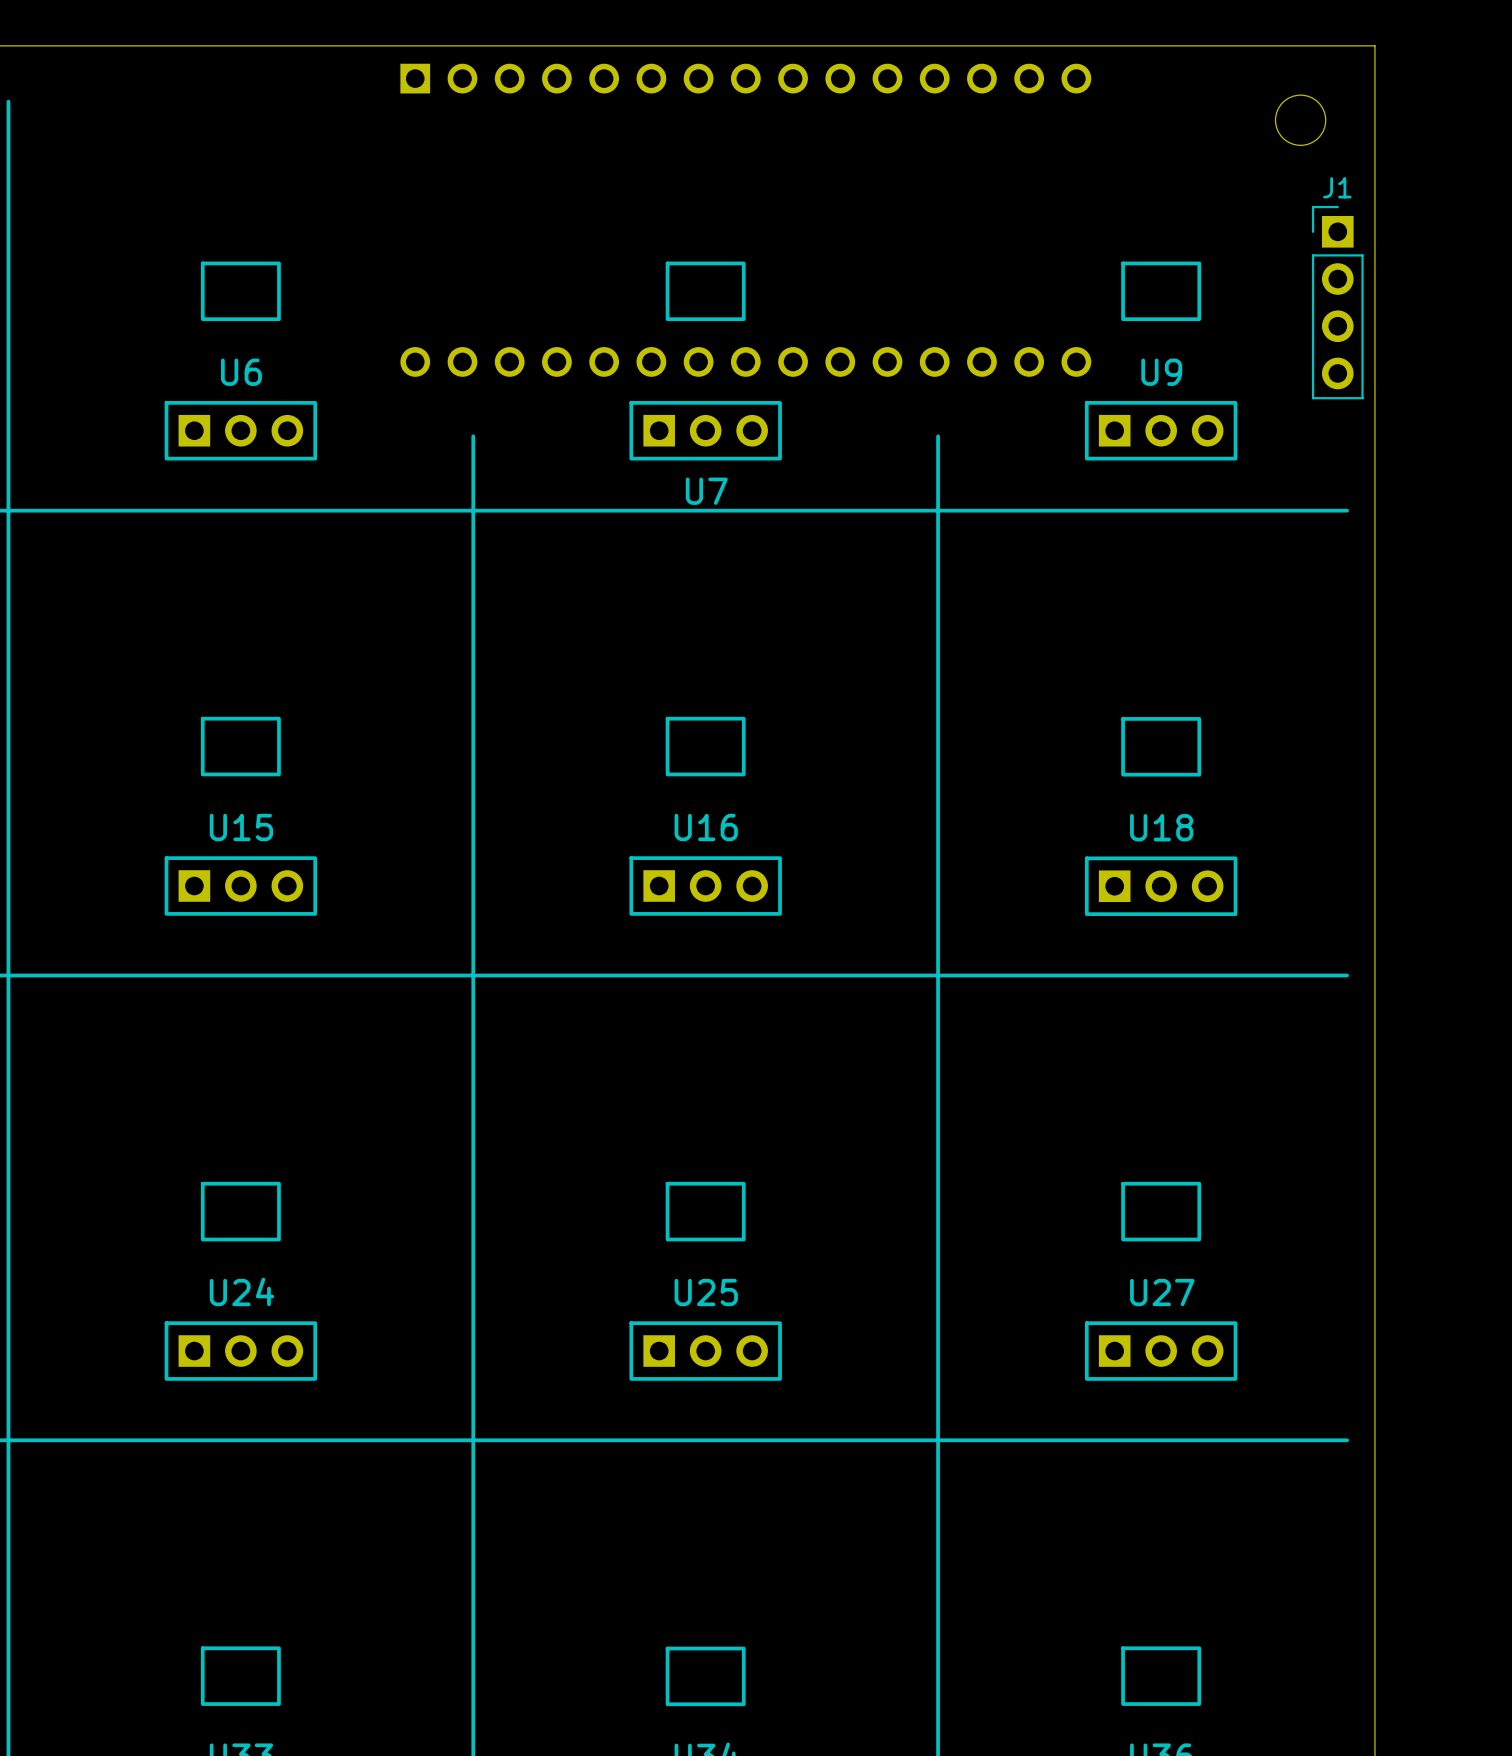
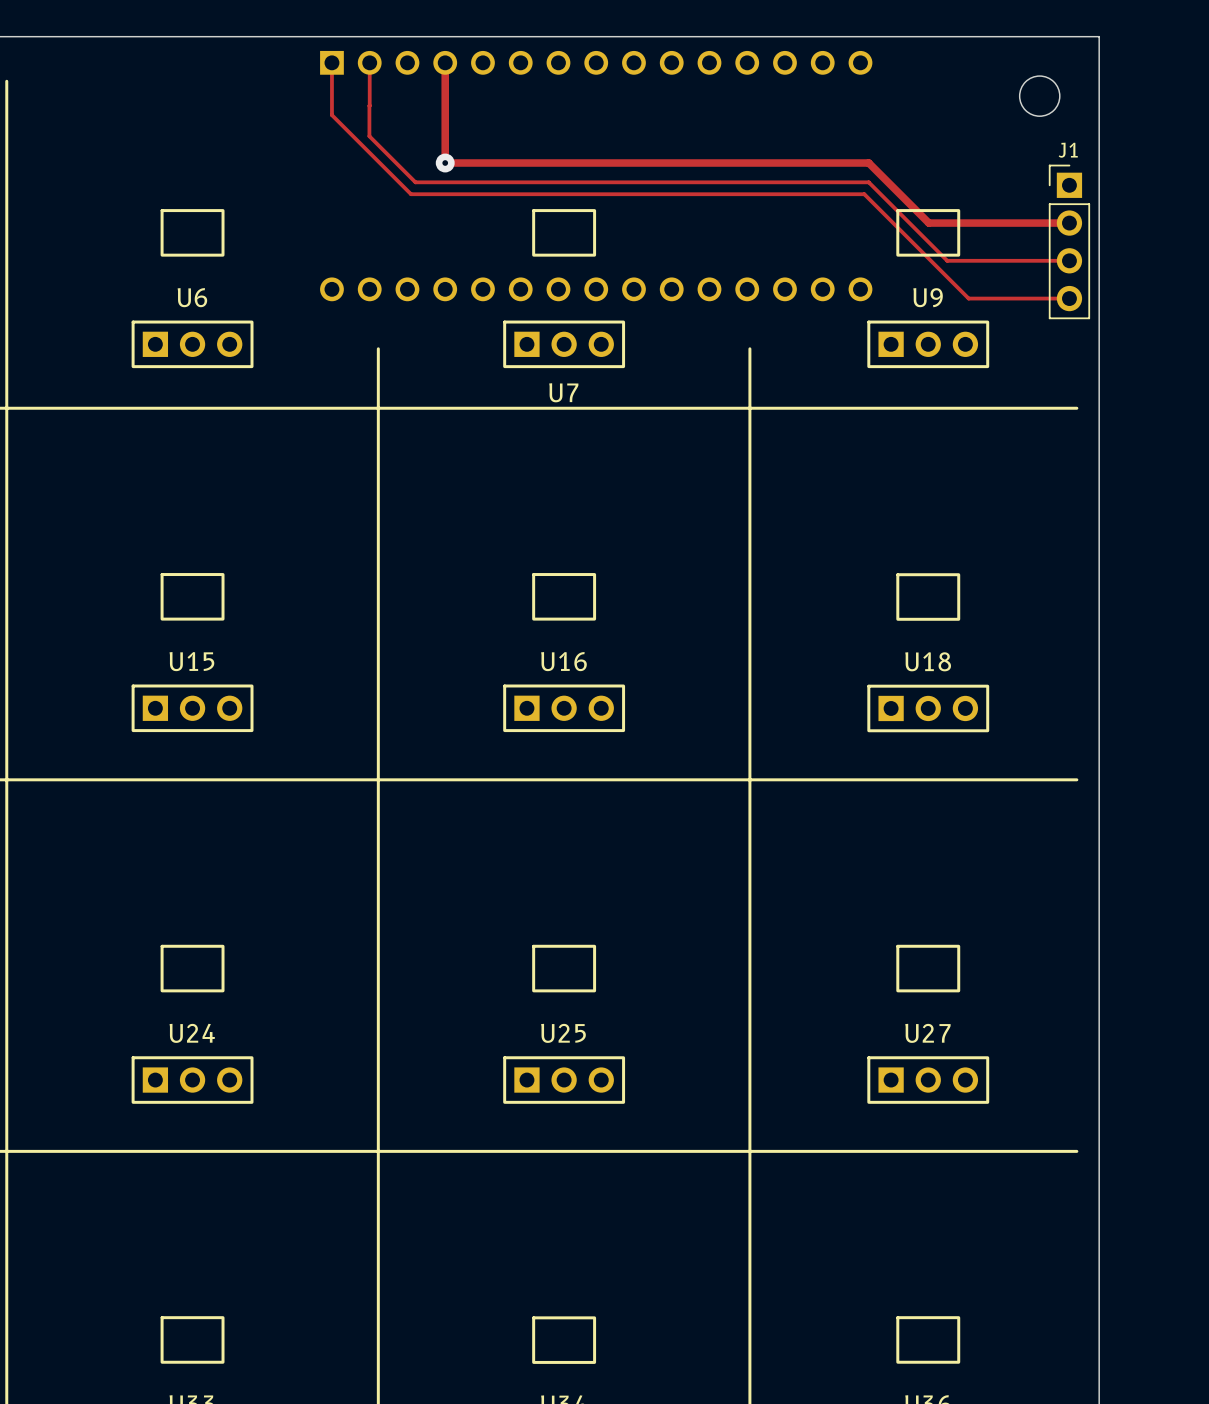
track: none -> (331, 62) (331, 115) (411, 194) (864, 194) (968, 298) (1069, 298)
track: none -> (369, 62) (369, 136) (415, 182) (868, 182) (947, 260) (1069, 260)
track: none -> (445, 62) (445, 163) (868, 163) (928, 223) (1069, 223)
via: none -> (445, 163)

